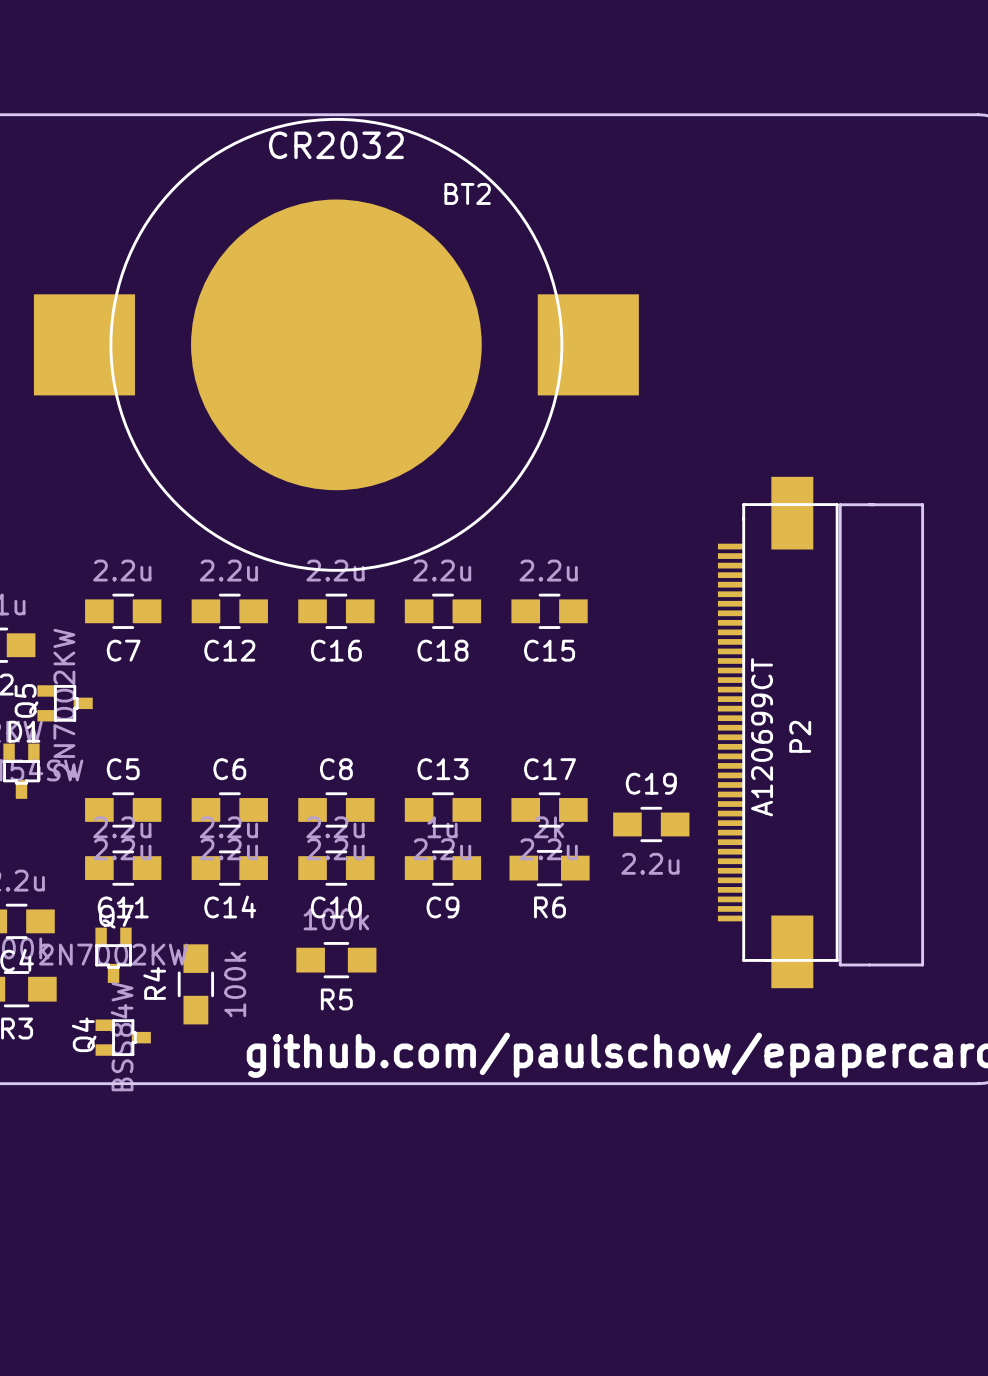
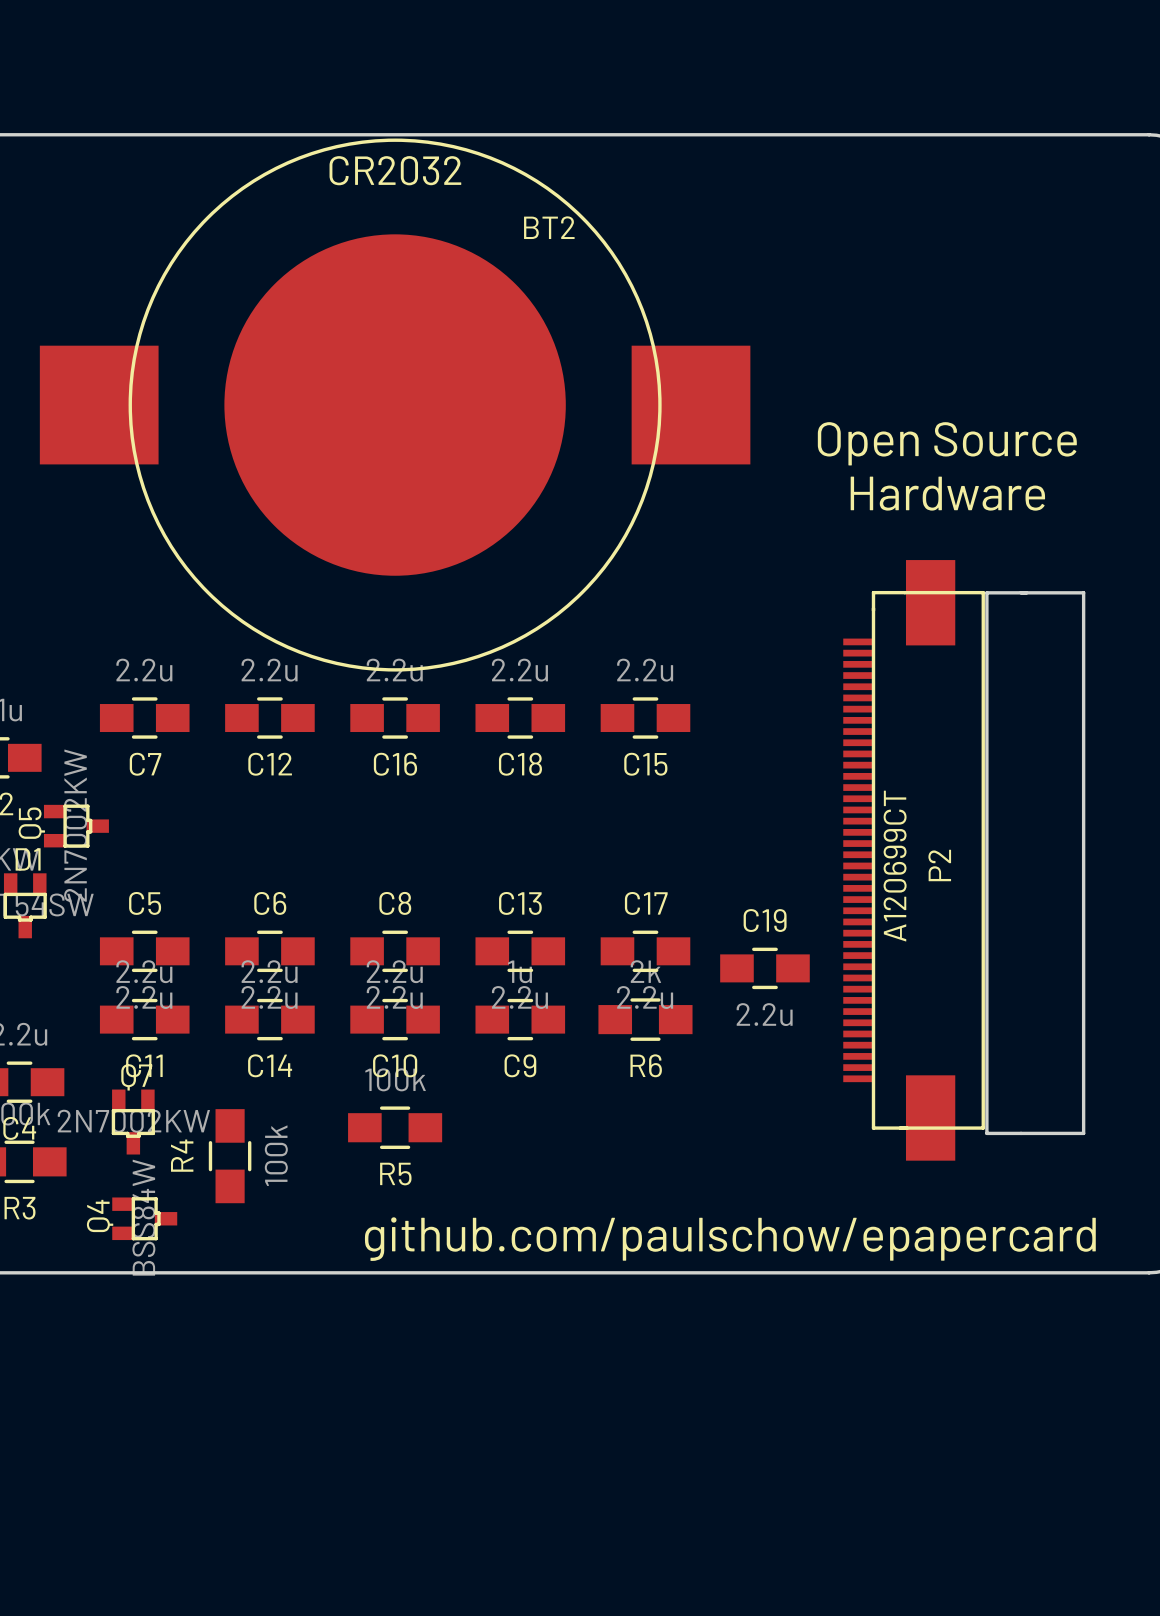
text: none -> Open Source (947, 443)
text: none -> Hardware (947, 493)

